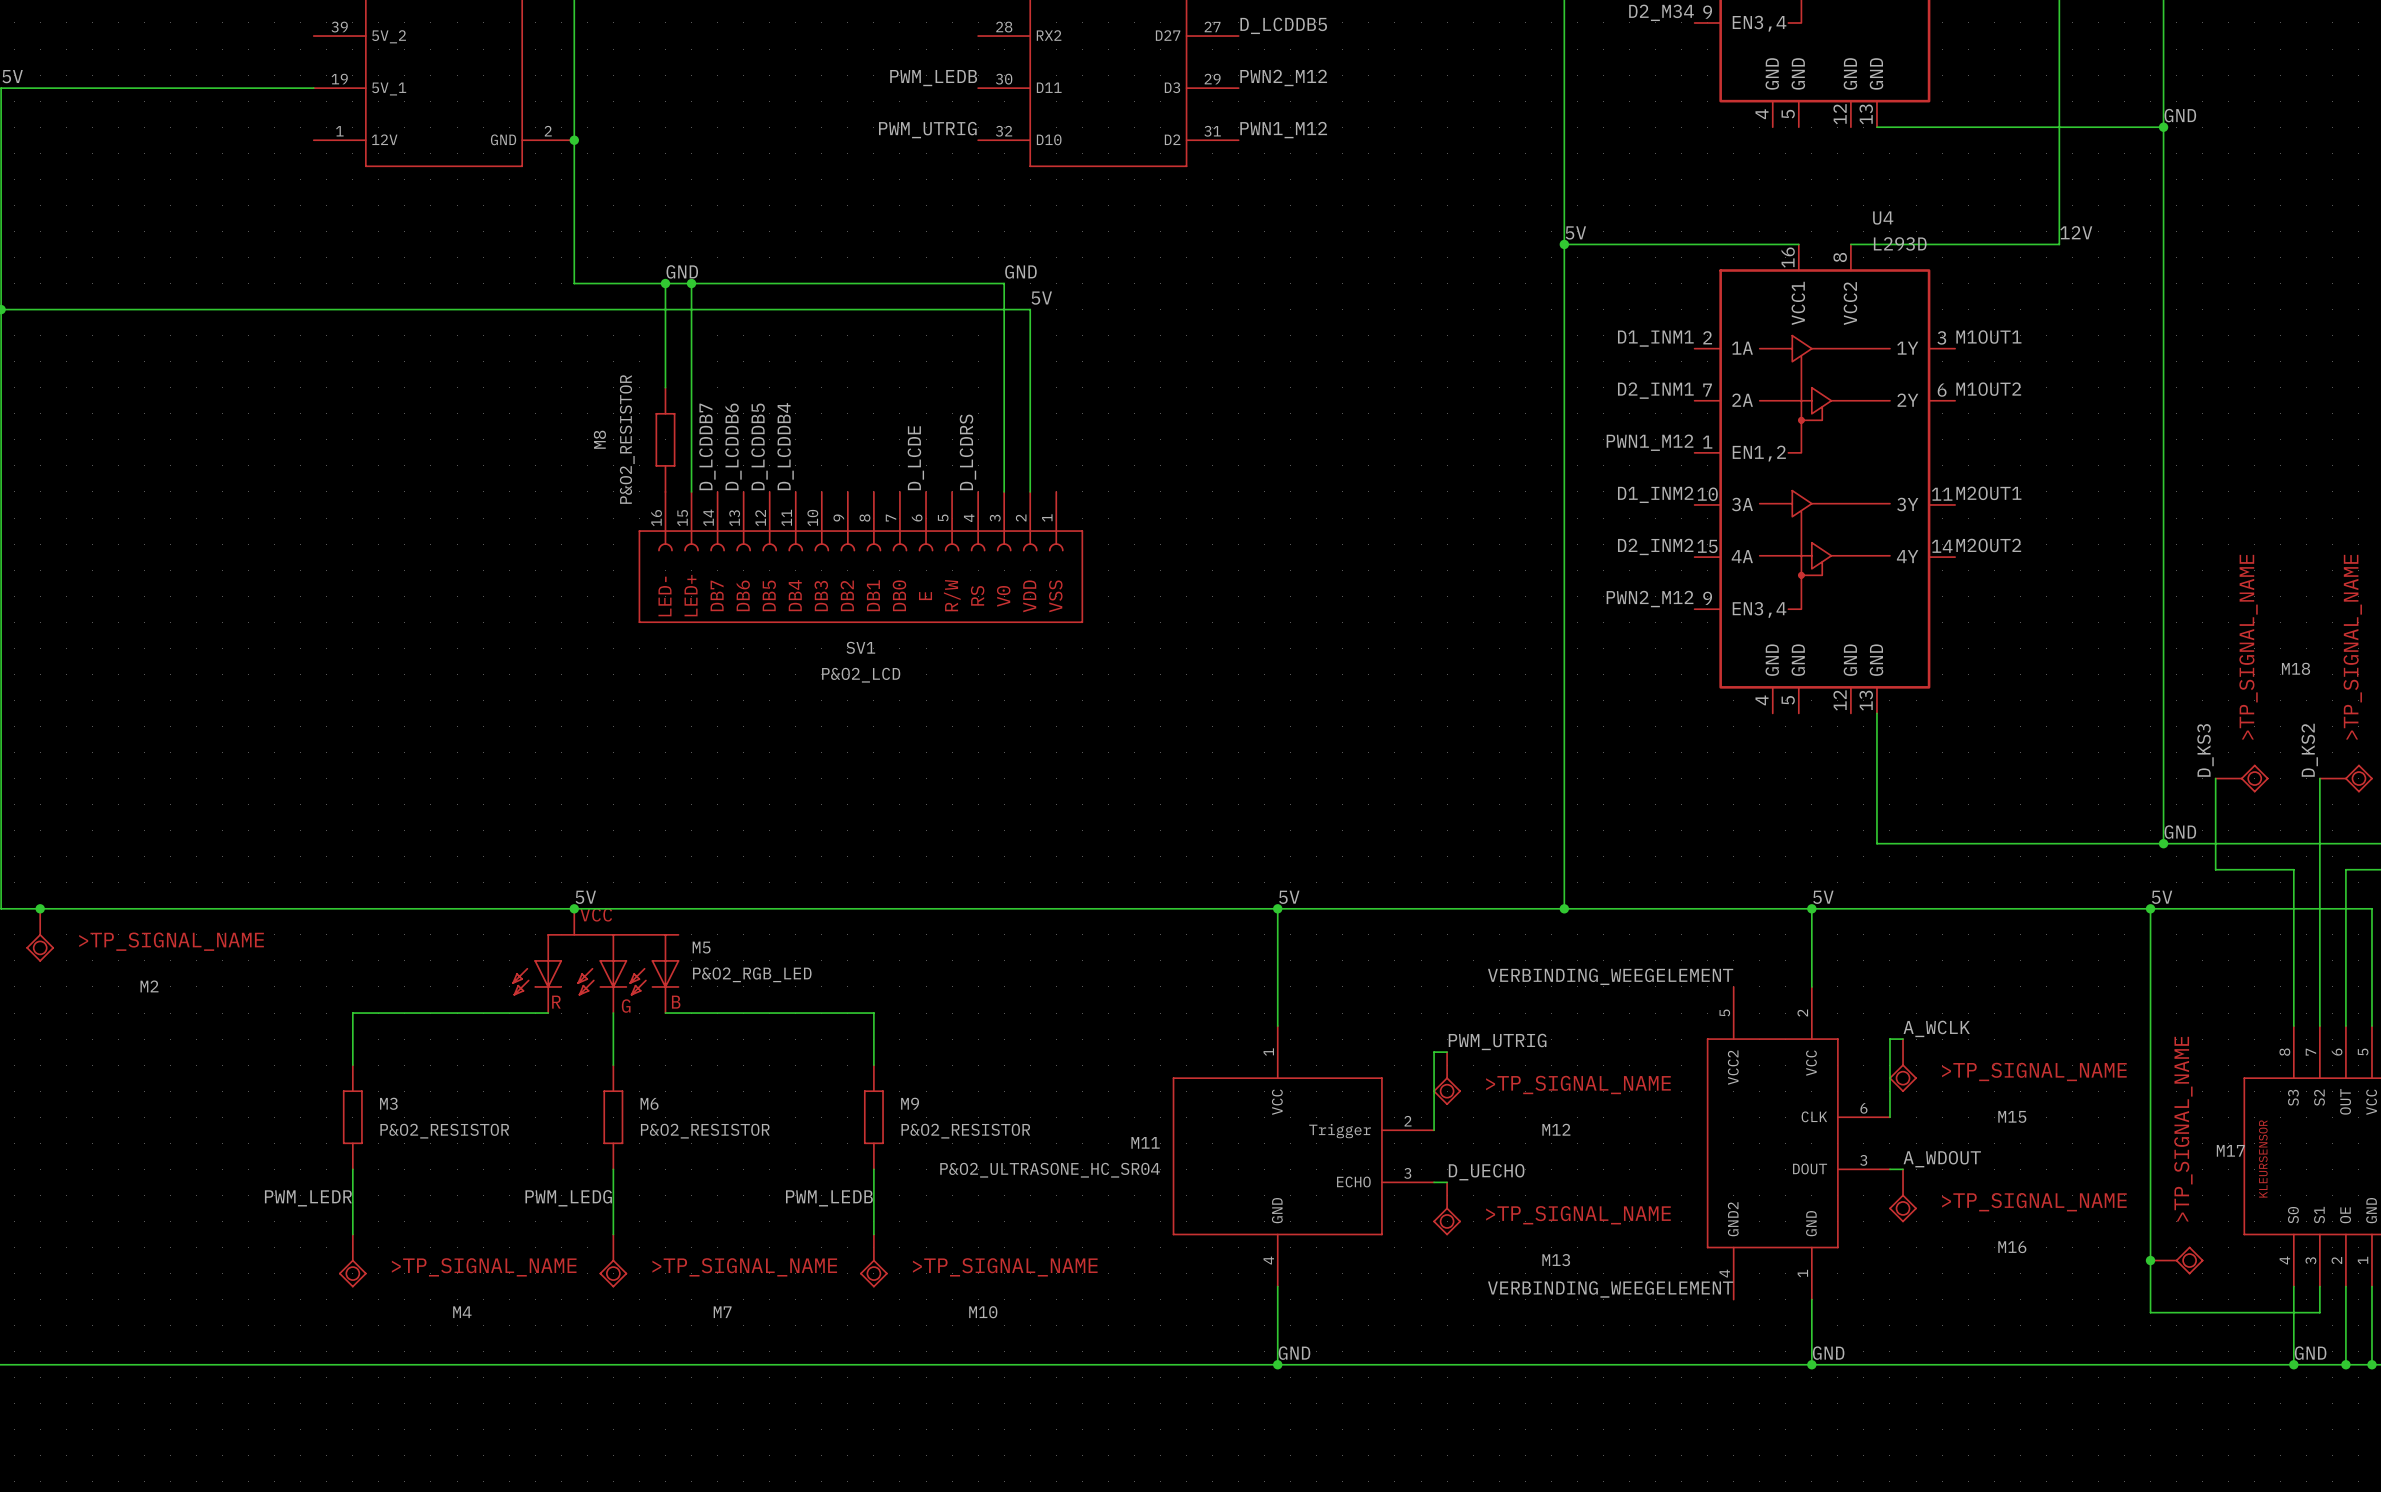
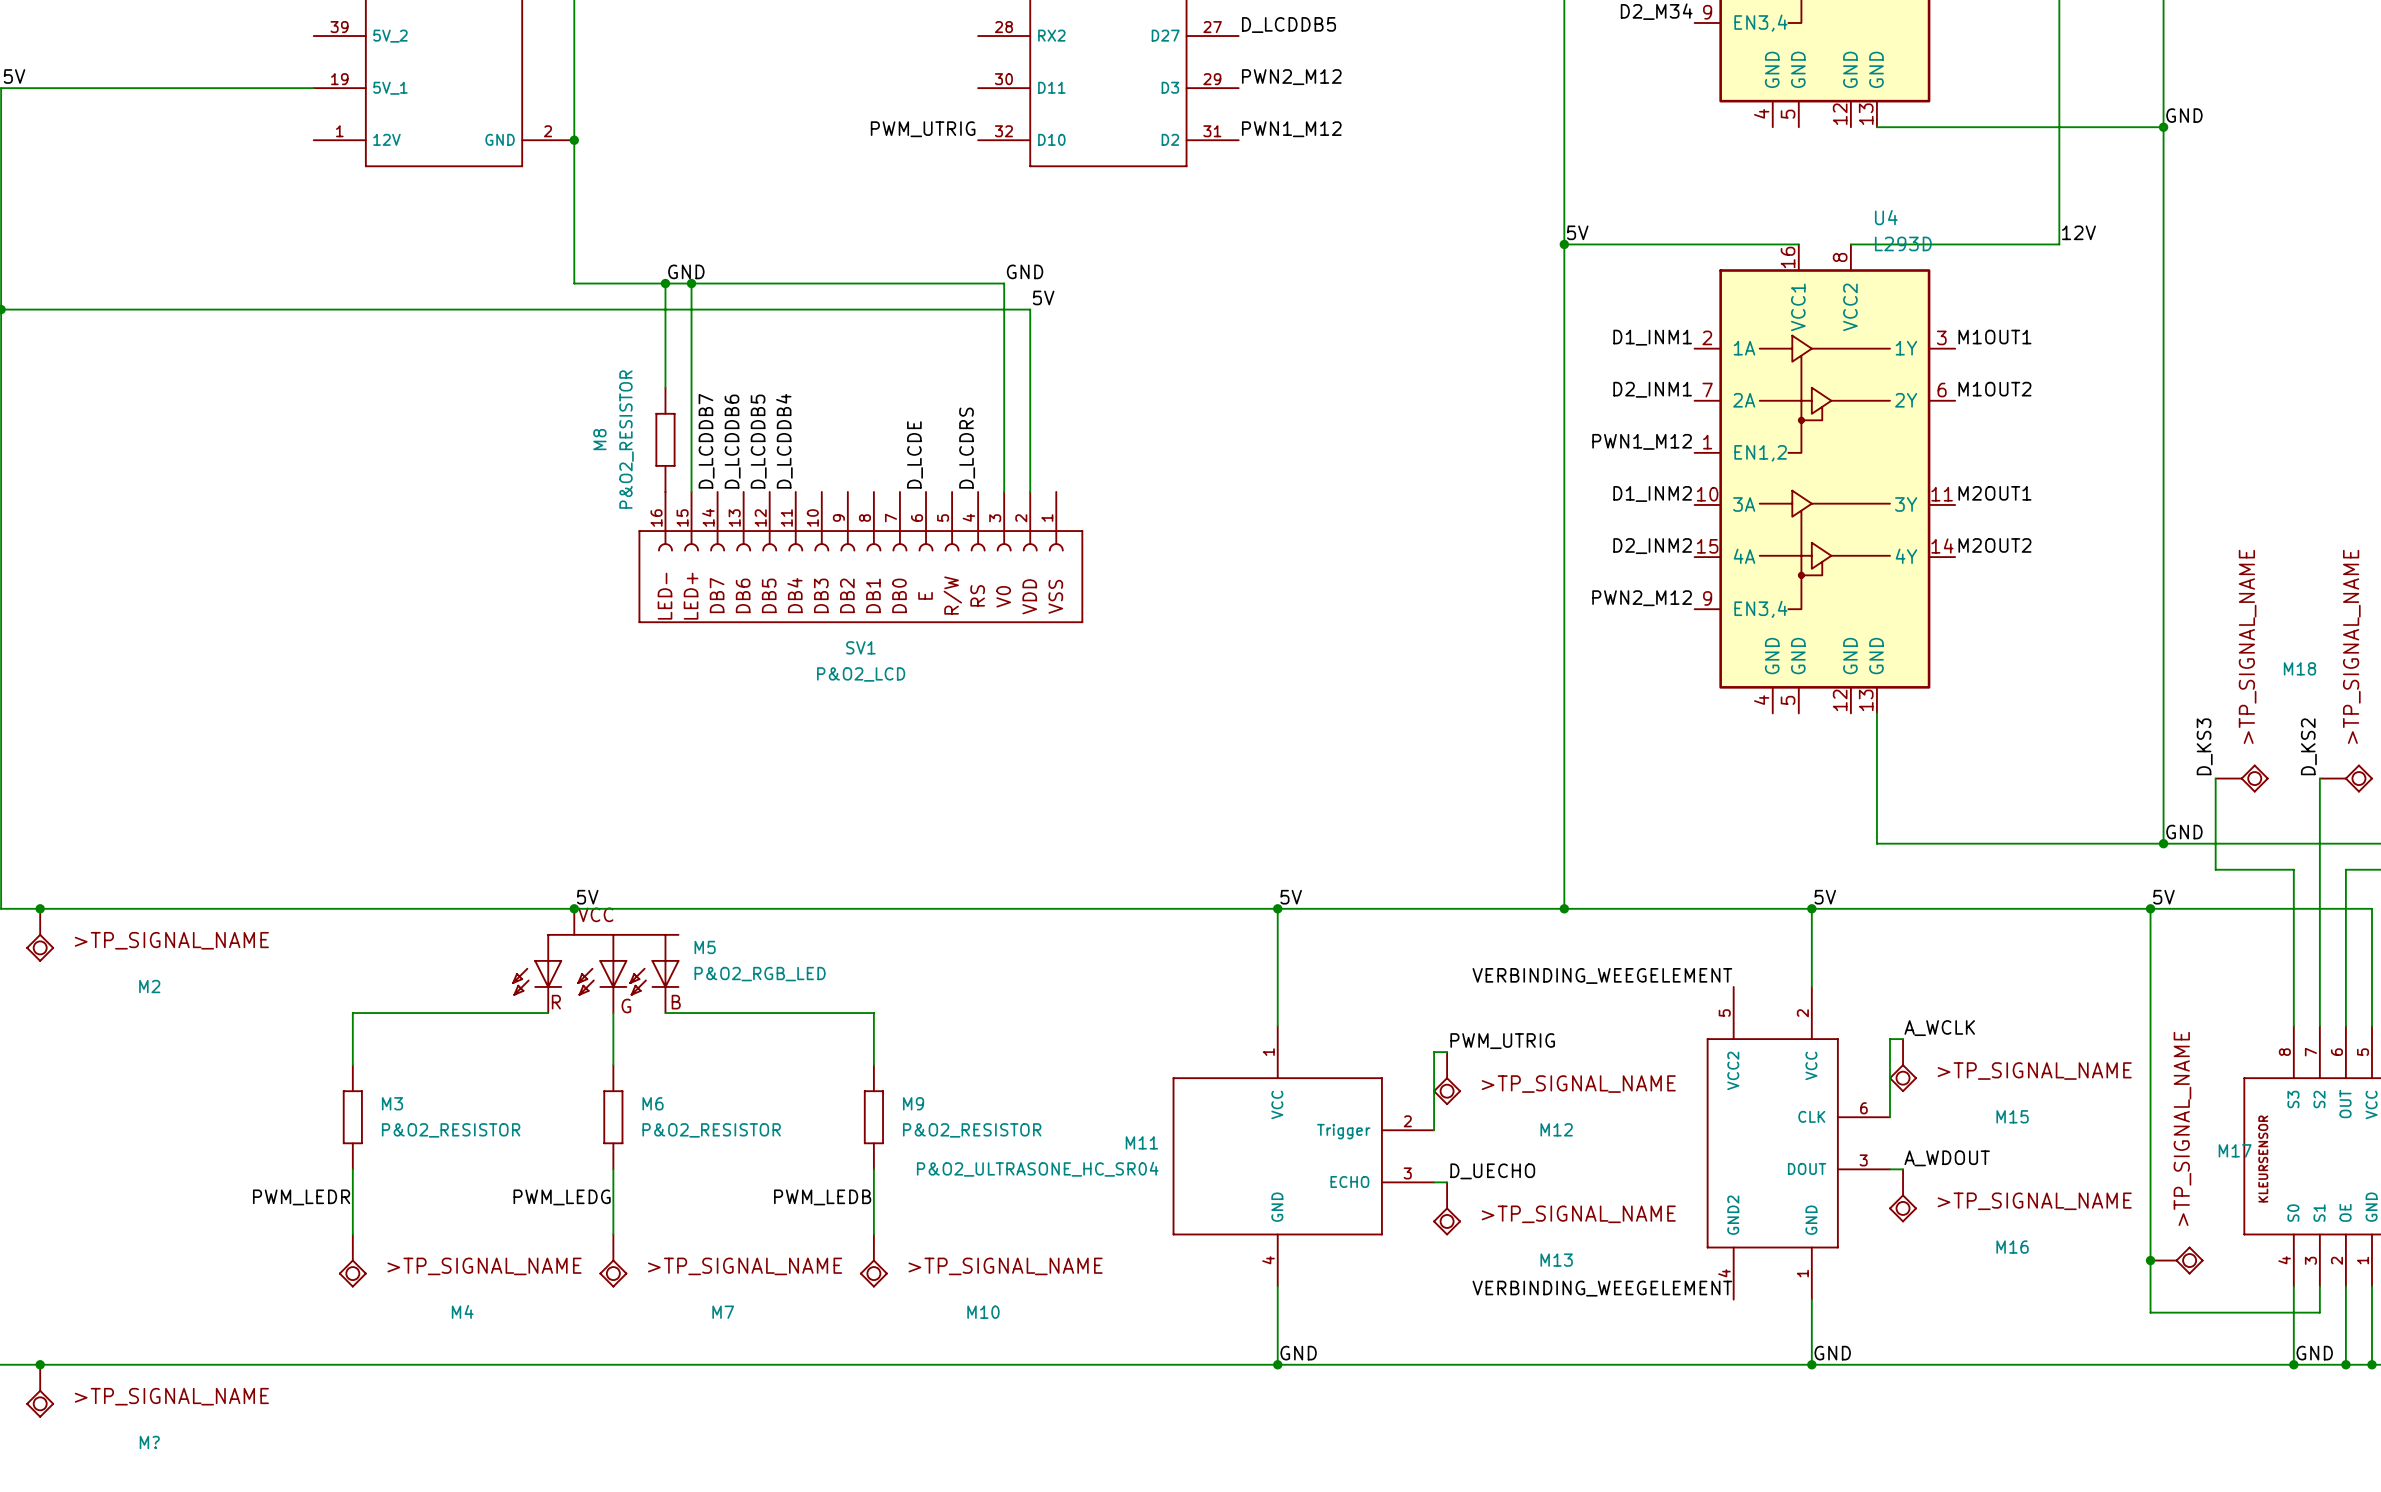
label: PWM_LEDB (933, 78) -> none
junction: none -> (40, 1364)
M?: none -> (40, 1390)

